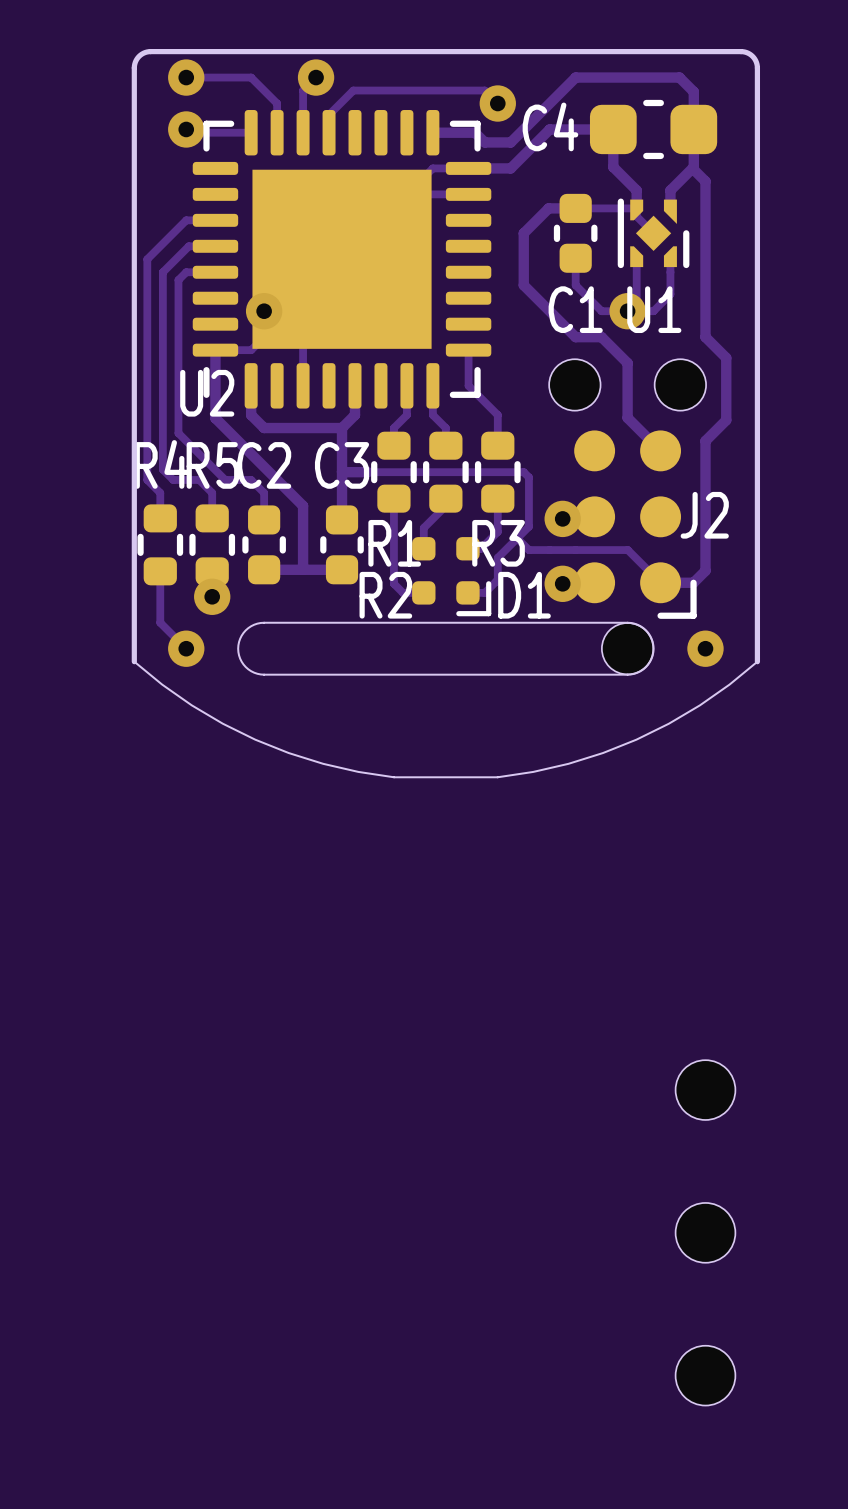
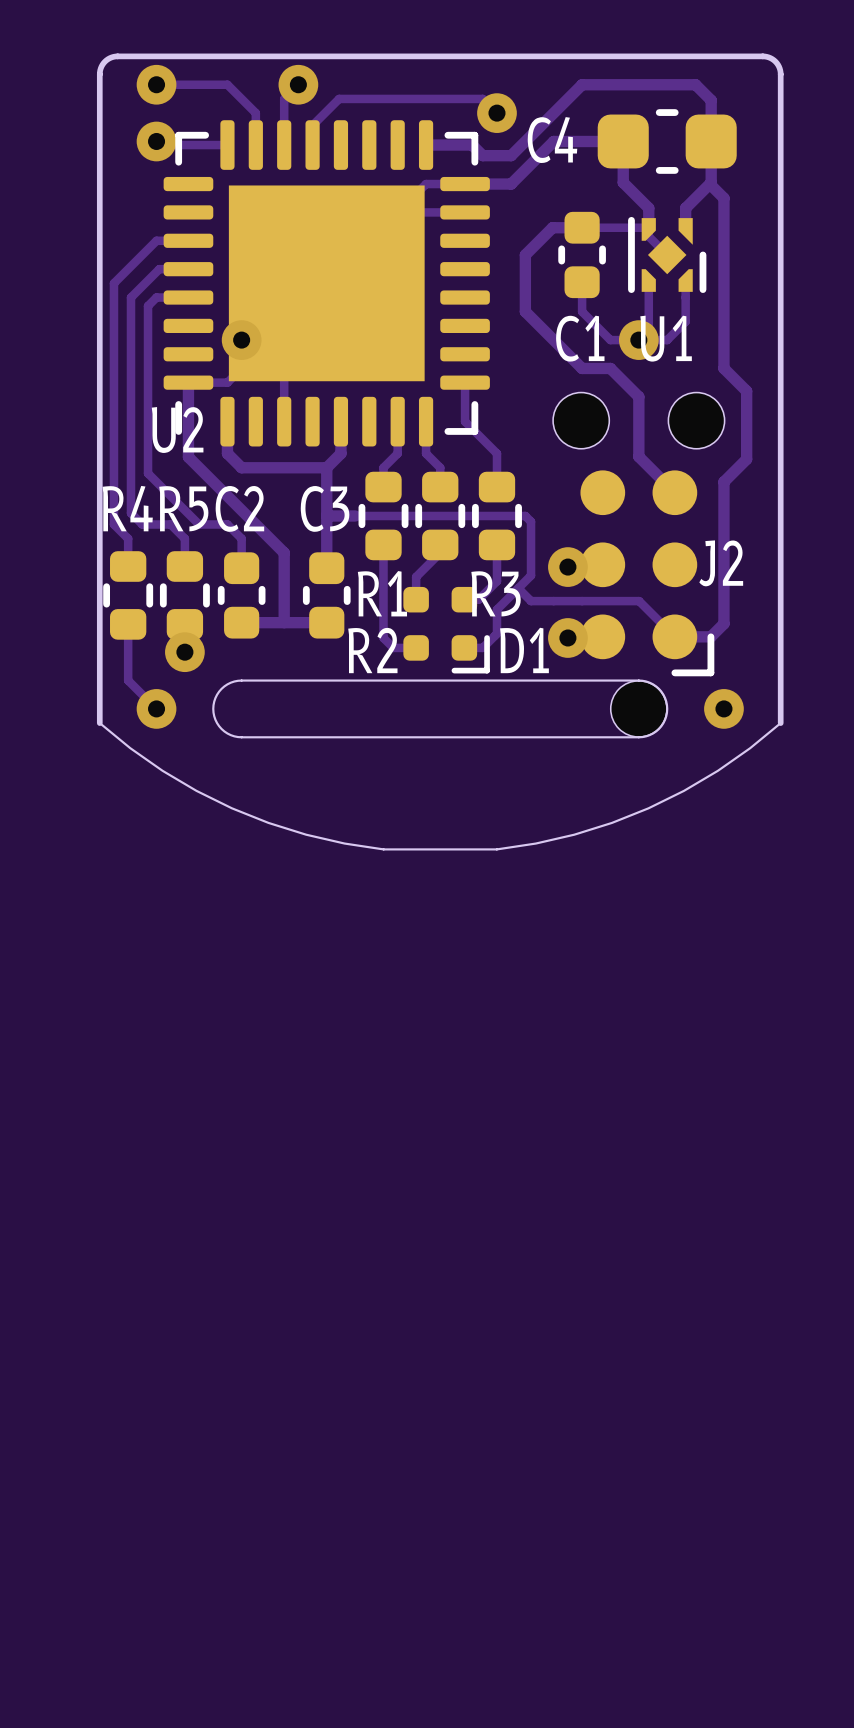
part: (705, 1090) -> none
part: (705, 1232) -> none
part: (705, 1375) -> none

